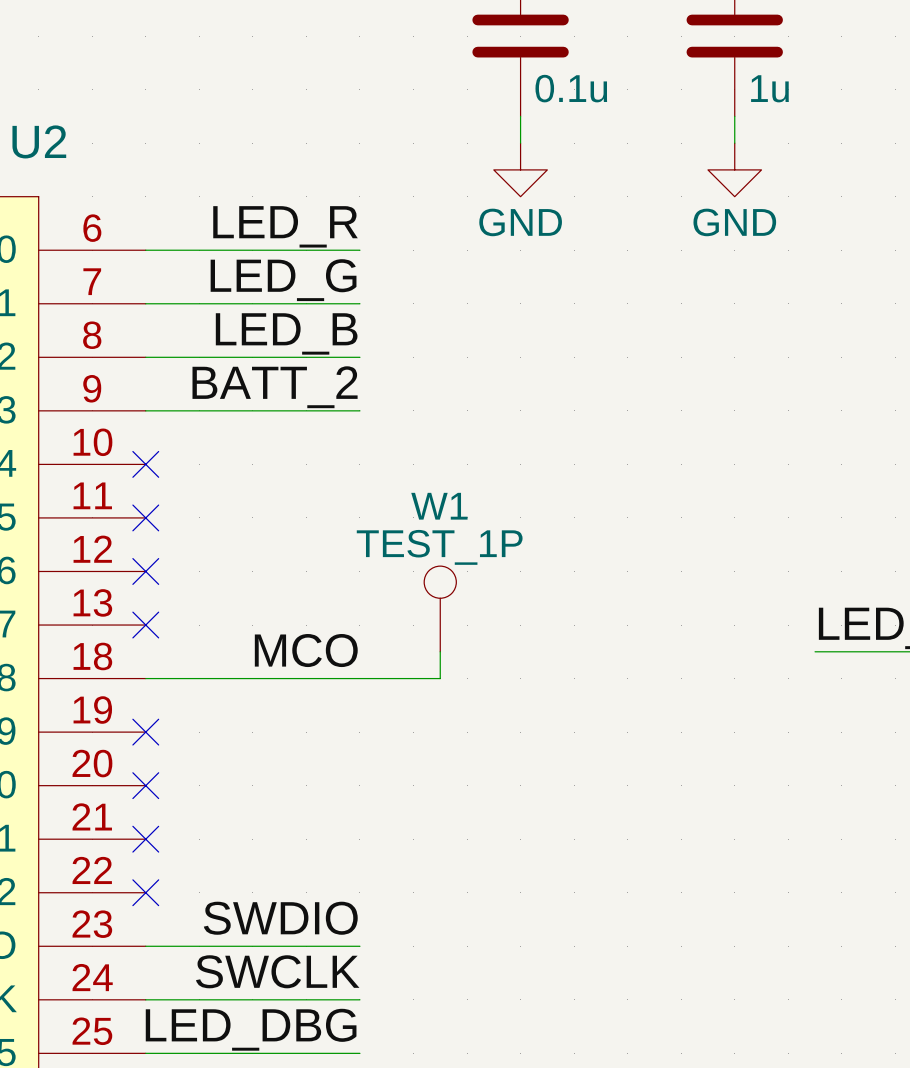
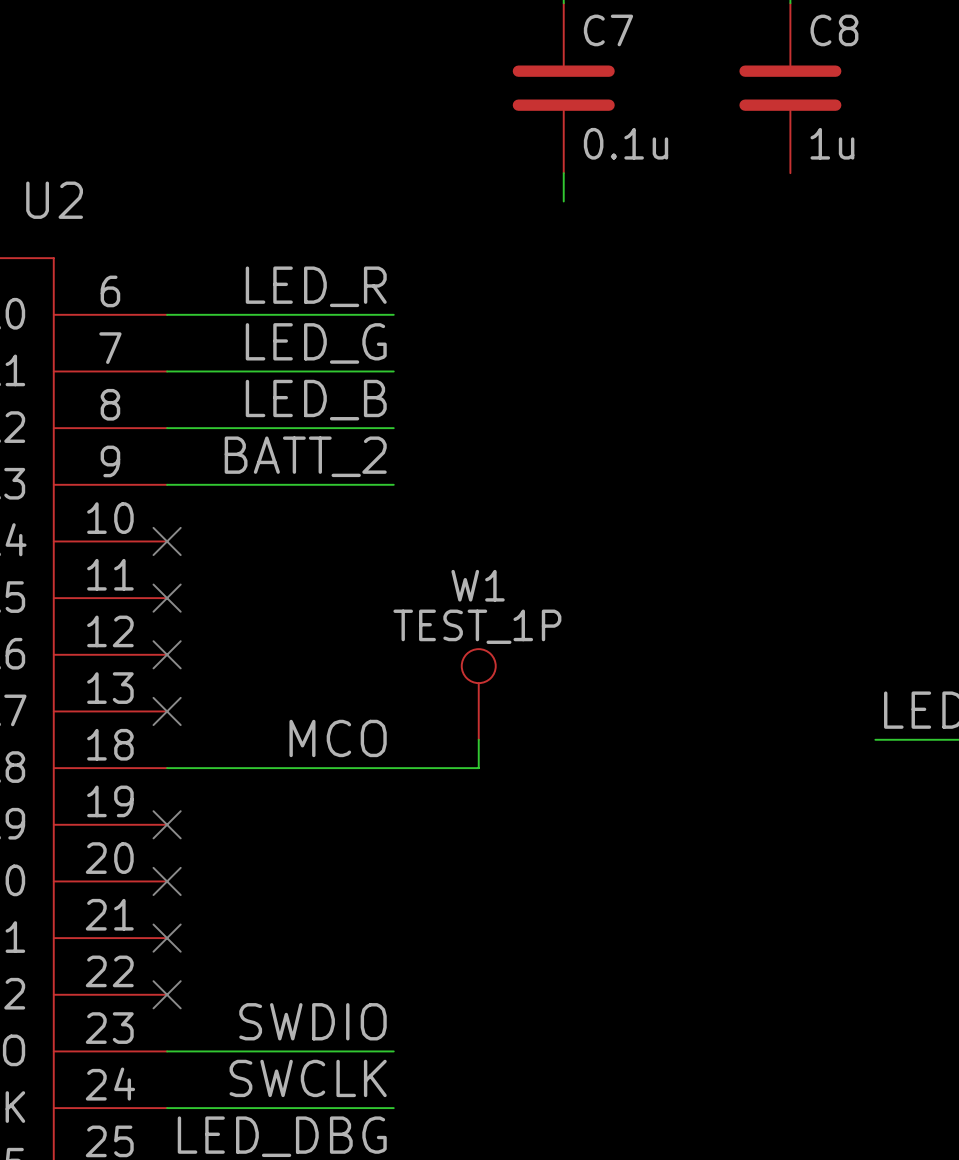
wire: (734, 116) (734, 143) -> none
power symbol: GND (520, 169) -> none
power symbol: GND (734, 169) -> none

